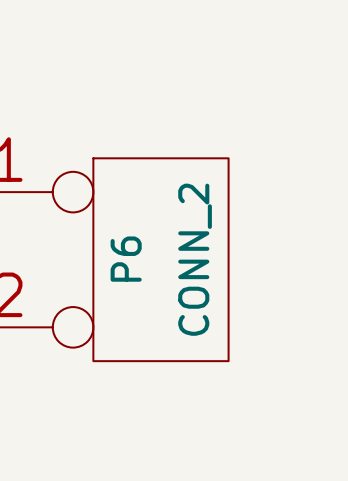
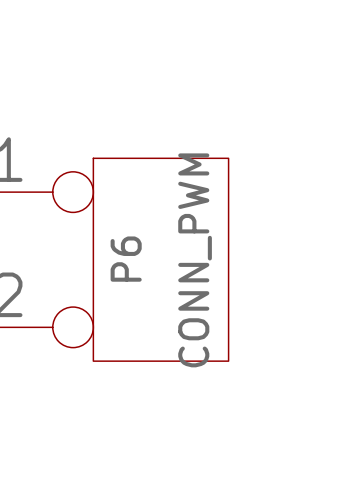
P6 value: CONN_2 (195, 259) -> CONN_PWM (195, 260)

